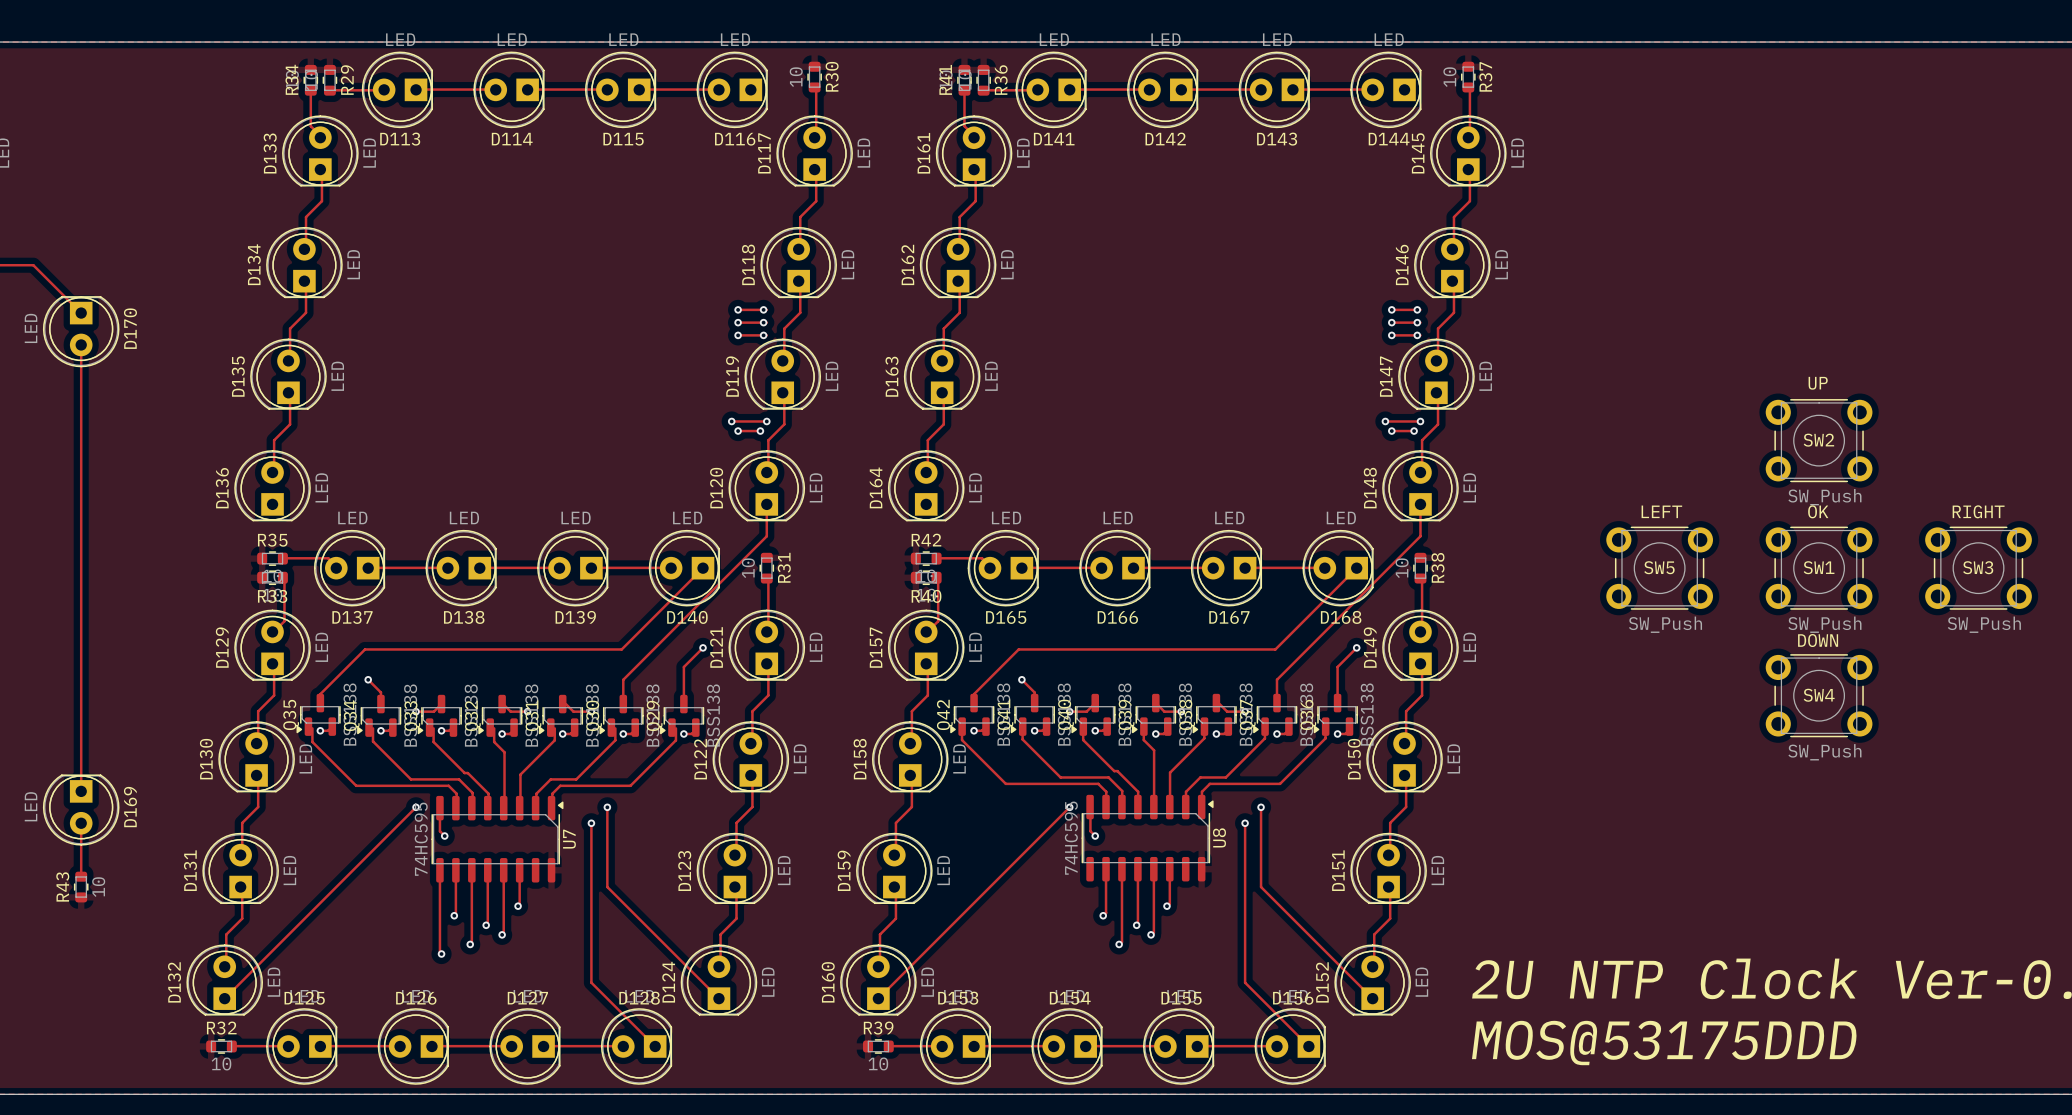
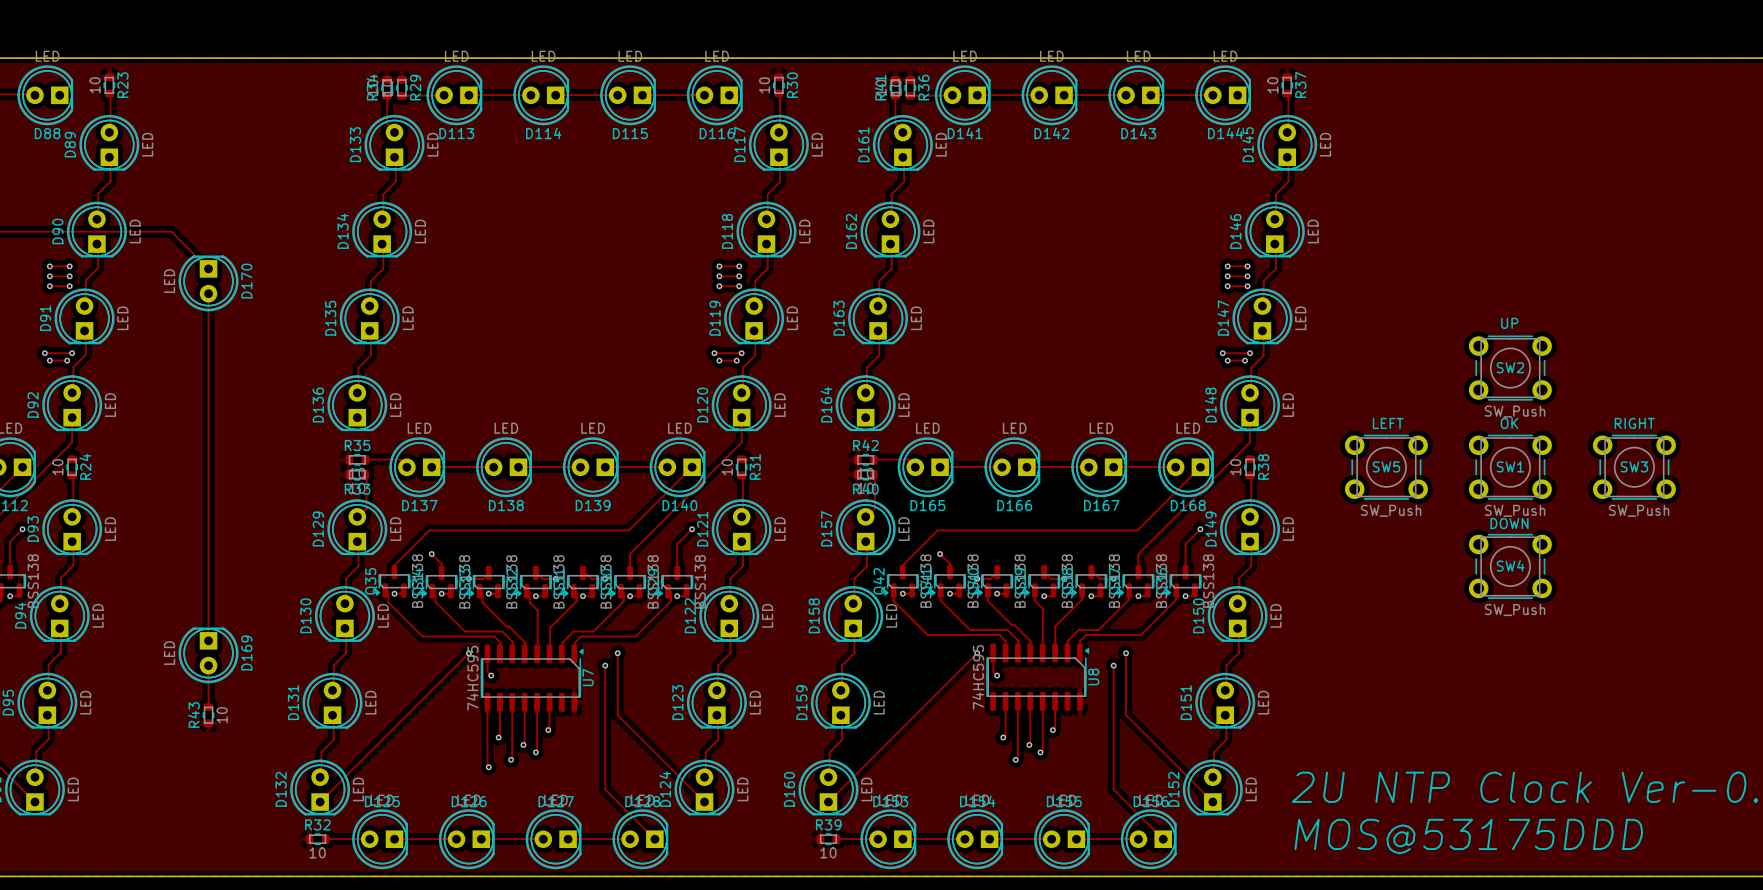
text position: UP (1818, 383) -> UP (1509, 323)
SW2 position: (1819, 440) -> (1510, 368)
text position: LEFT (1661, 511) -> LEFT (1388, 423)
text position: OK (1818, 511) -> OK (1509, 423)
text position: RIGHT (1978, 511) -> RIGHT (1634, 423)
SW5 position: (1659, 568) -> (1386, 467)
SW1 position: (1819, 568) -> (1510, 467)
SW3 position: (1978, 568) -> (1634, 467)
text position: DOWN (1818, 640) -> DOWN (1509, 523)
SW4 position: (1819, 695) -> (1510, 566)

